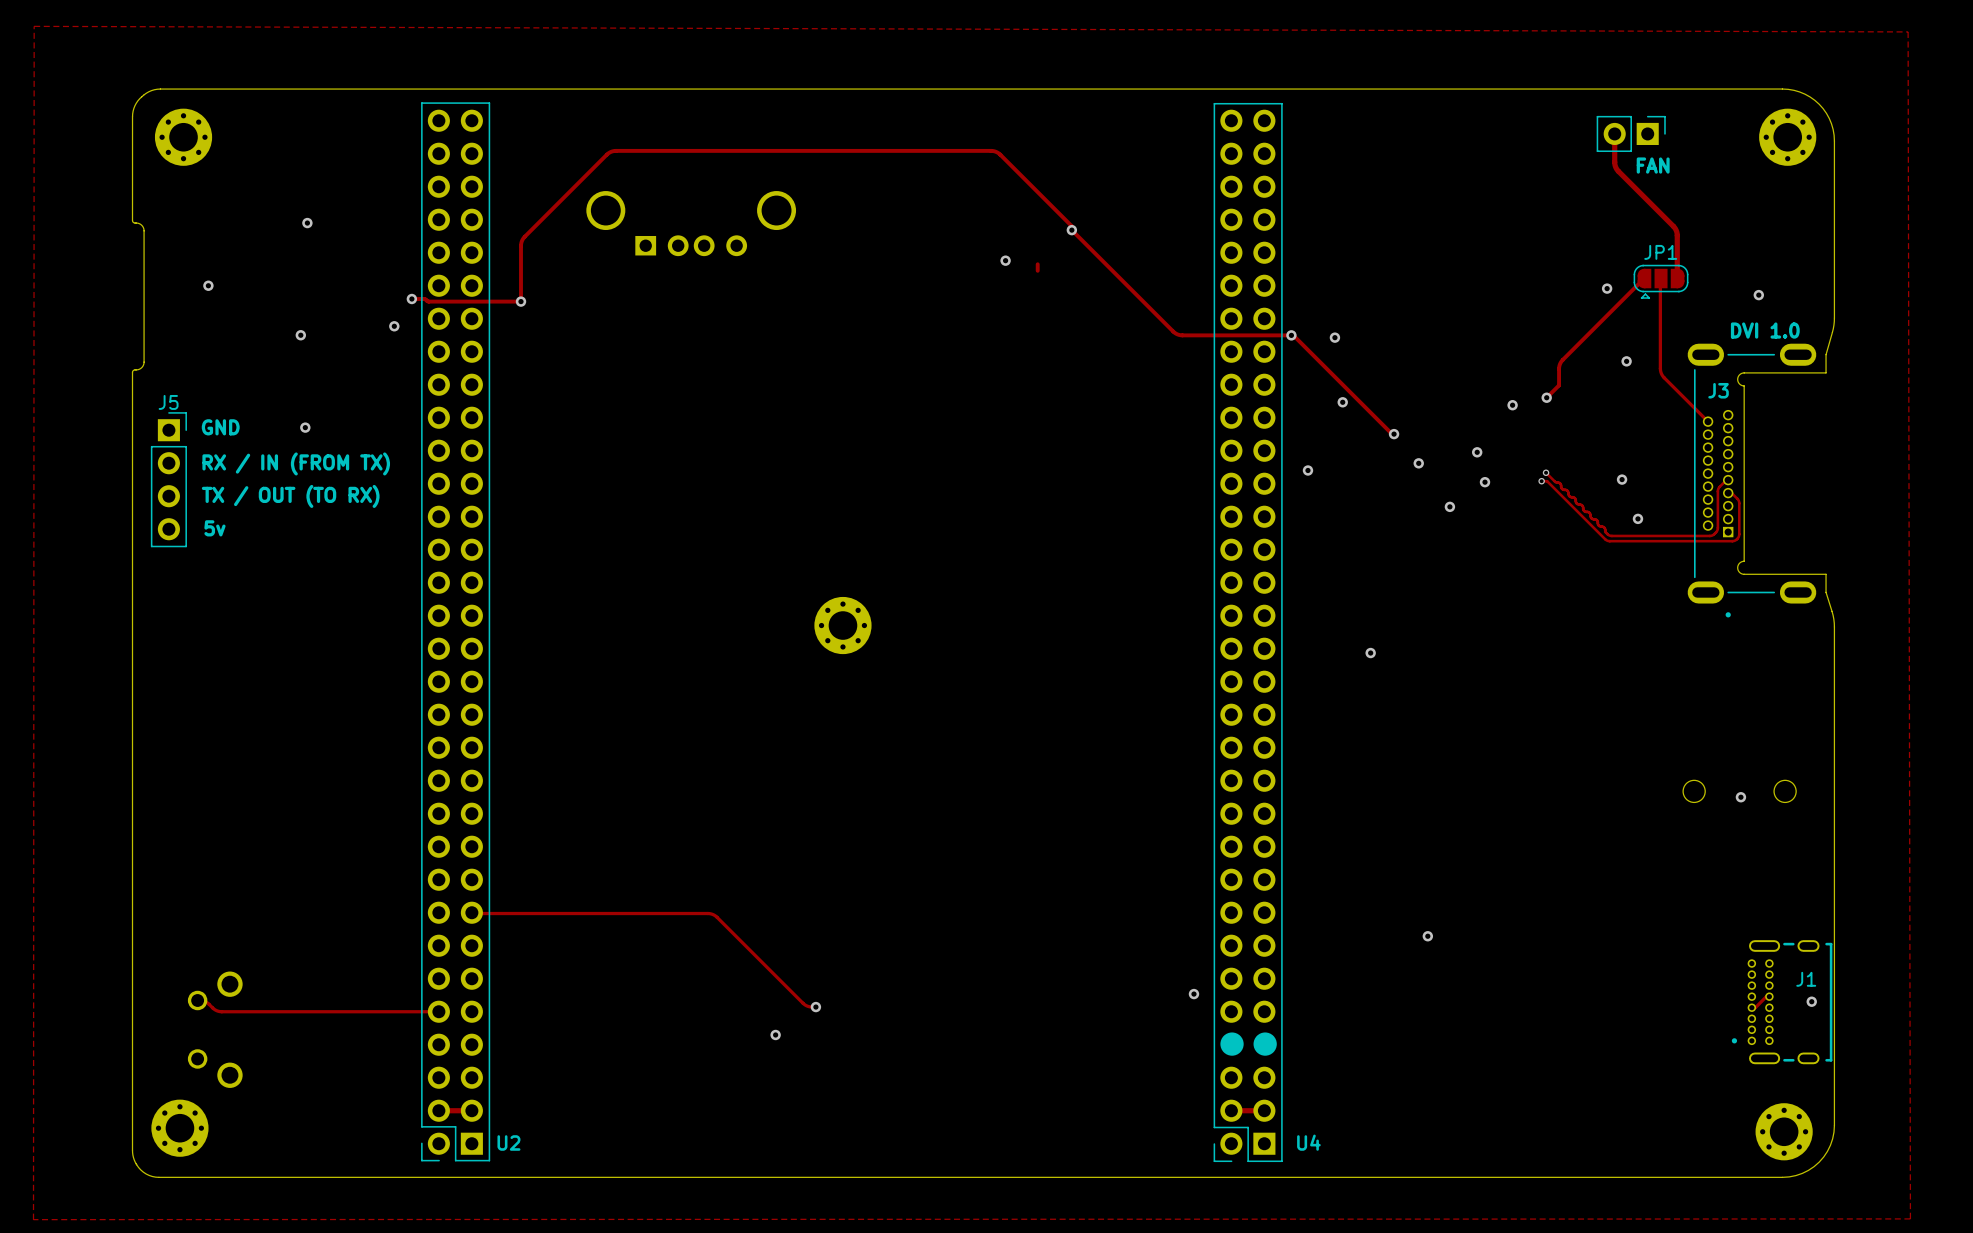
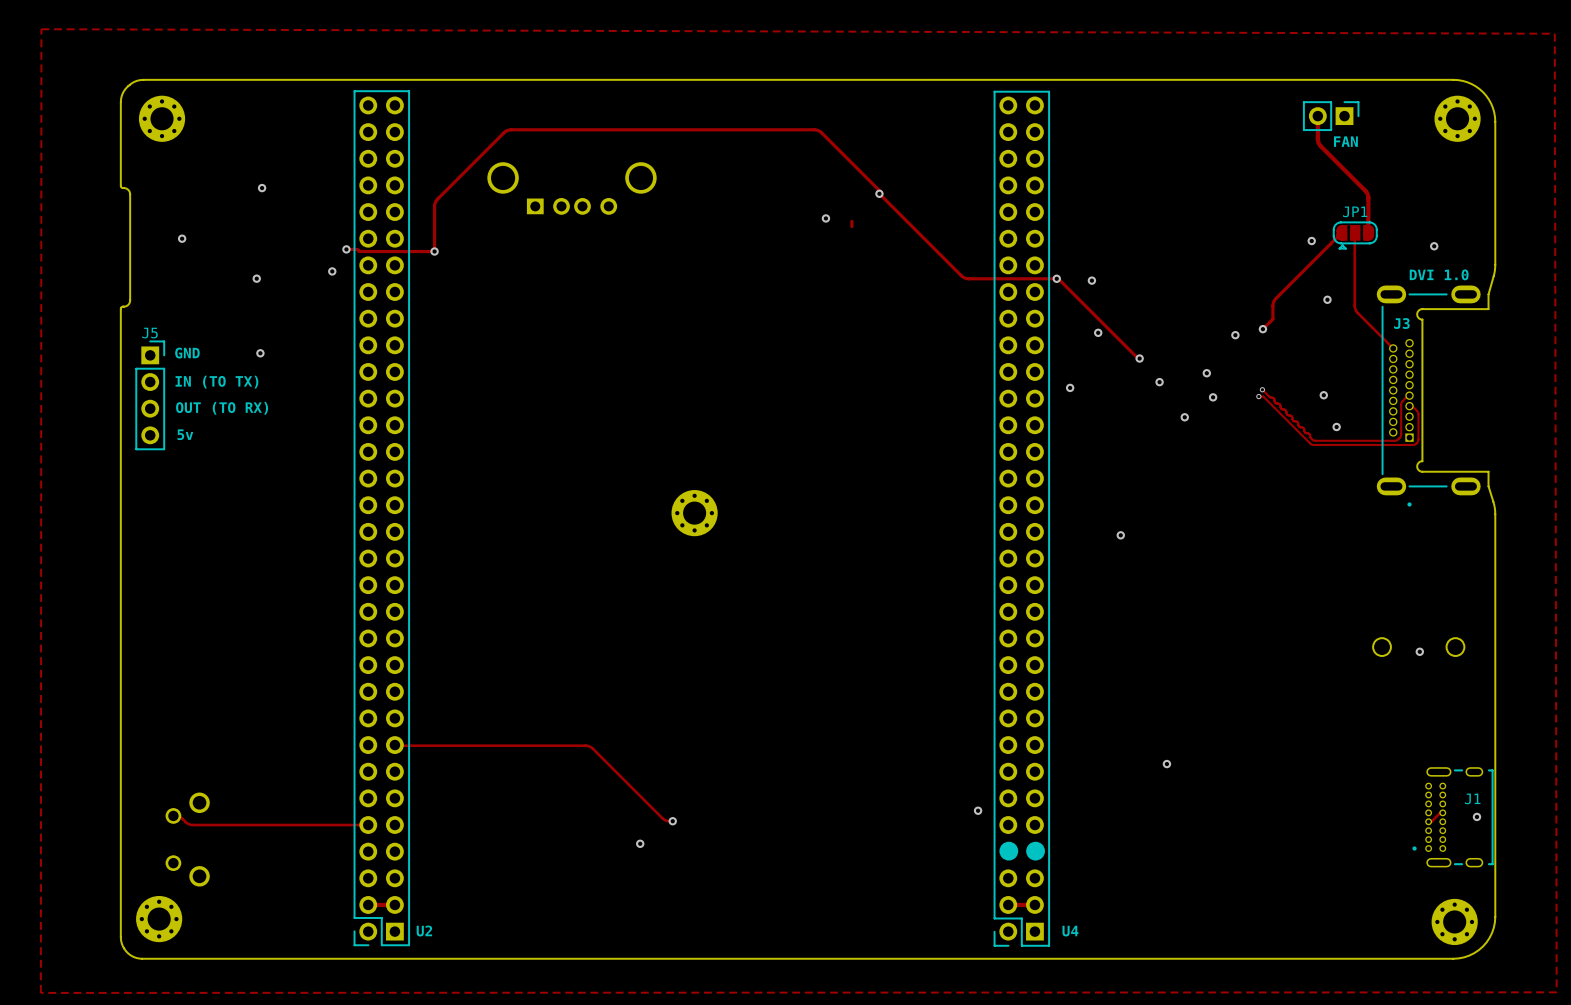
text: RX / IN (FROM TX) (296, 463) -> IN (TO TX) (216, 382)
text: TX / OUT (TO RX) (290, 496) -> OUT (TO RX) (222, 408)

